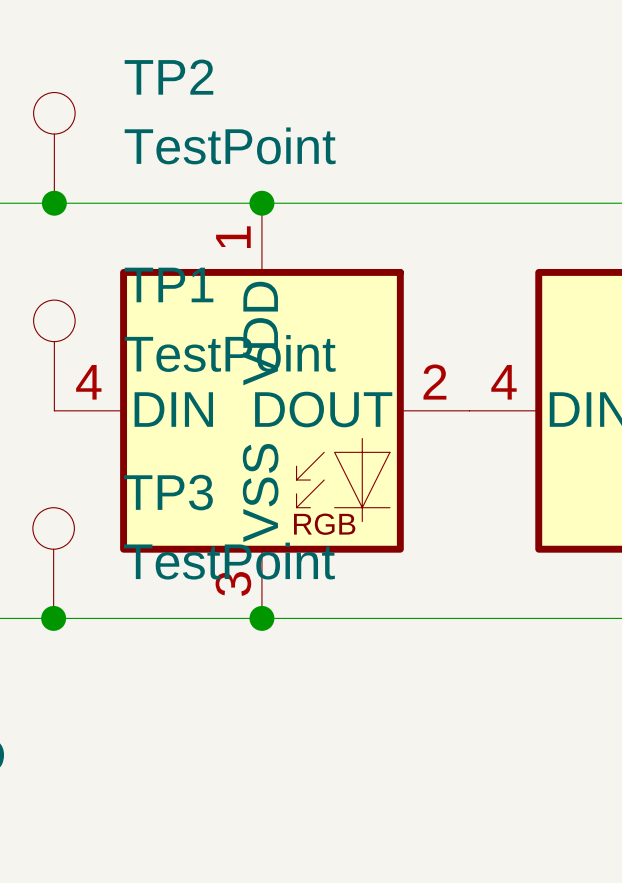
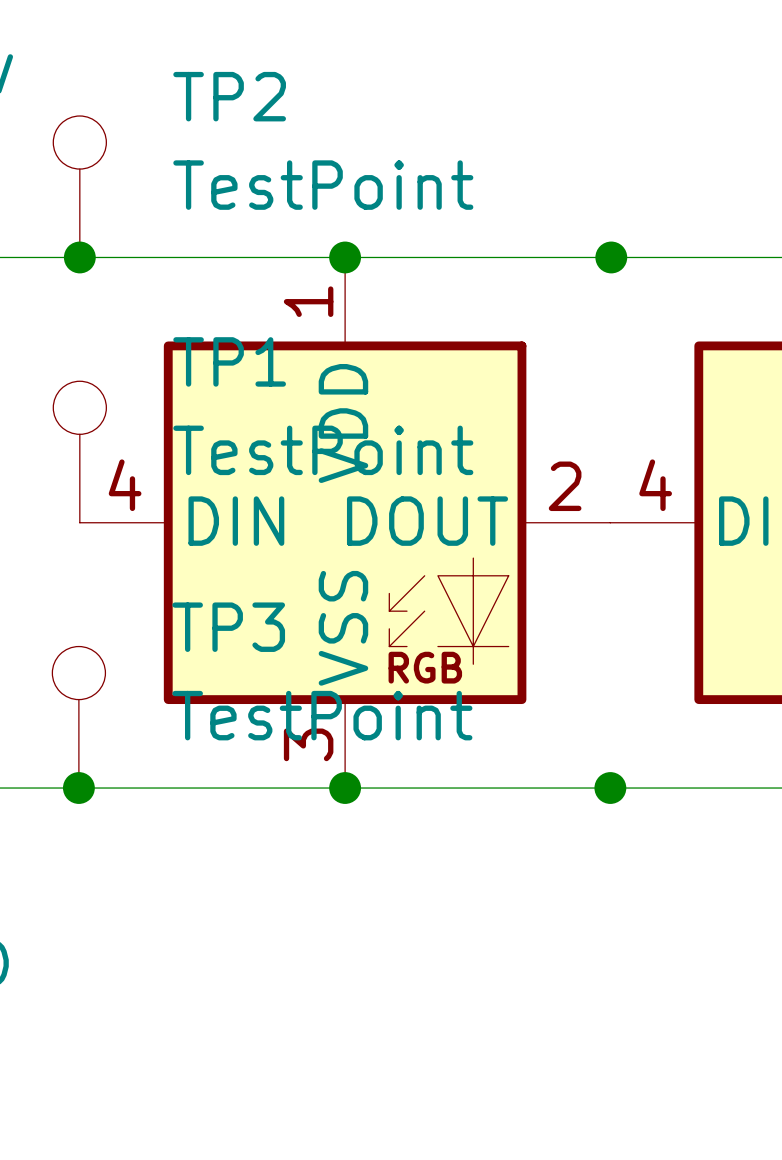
junction: none -> (611, 257)
junction: none -> (610, 788)

